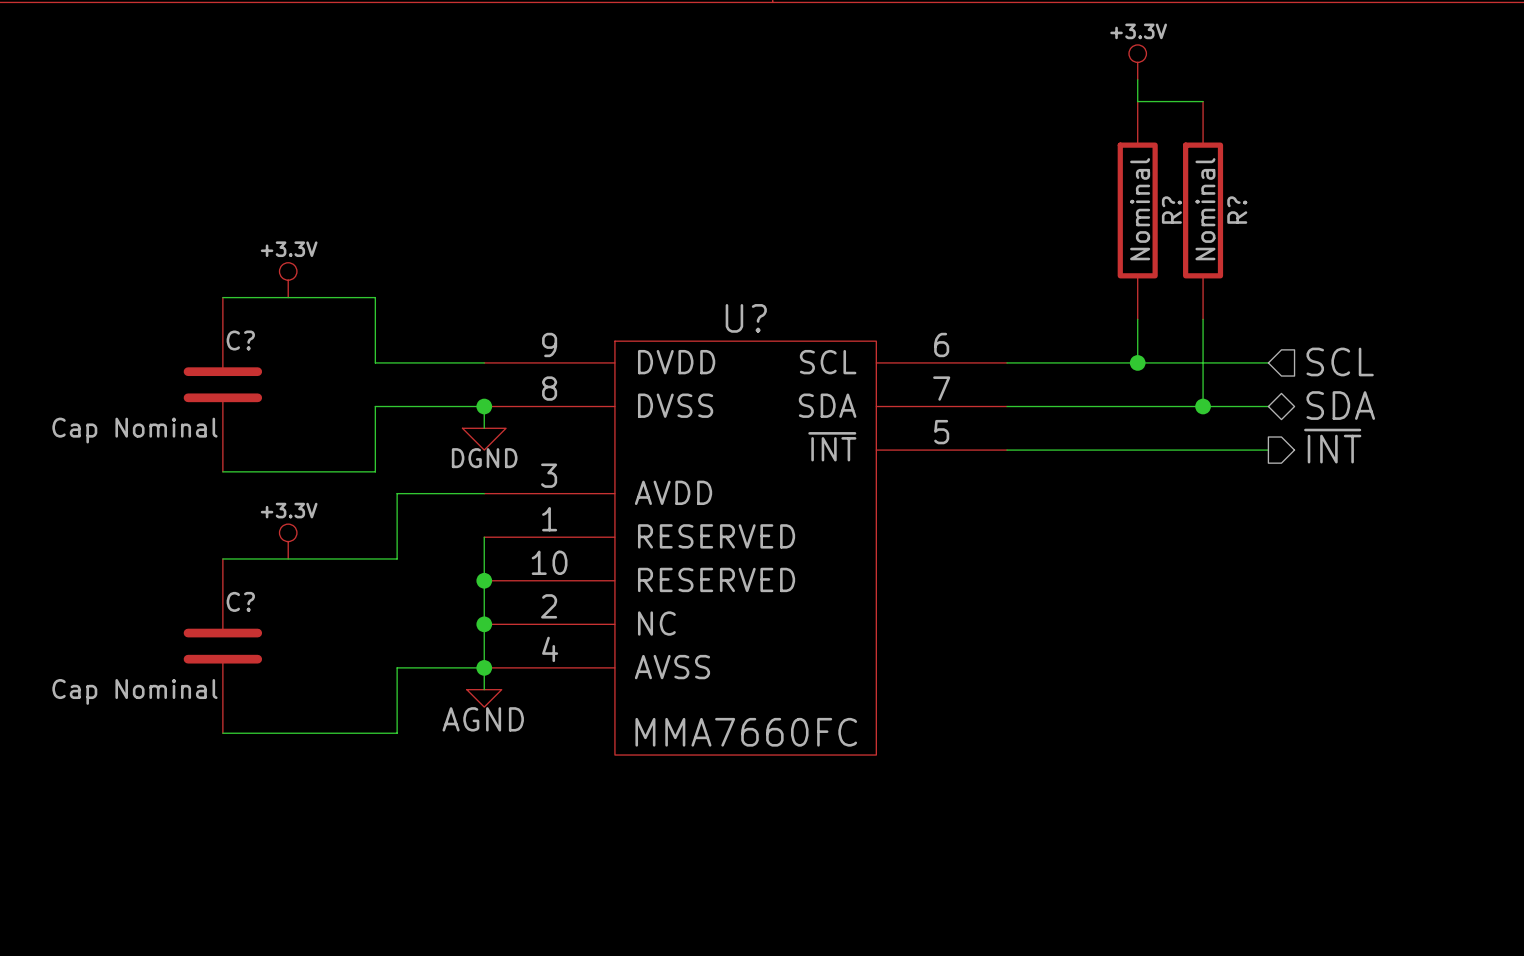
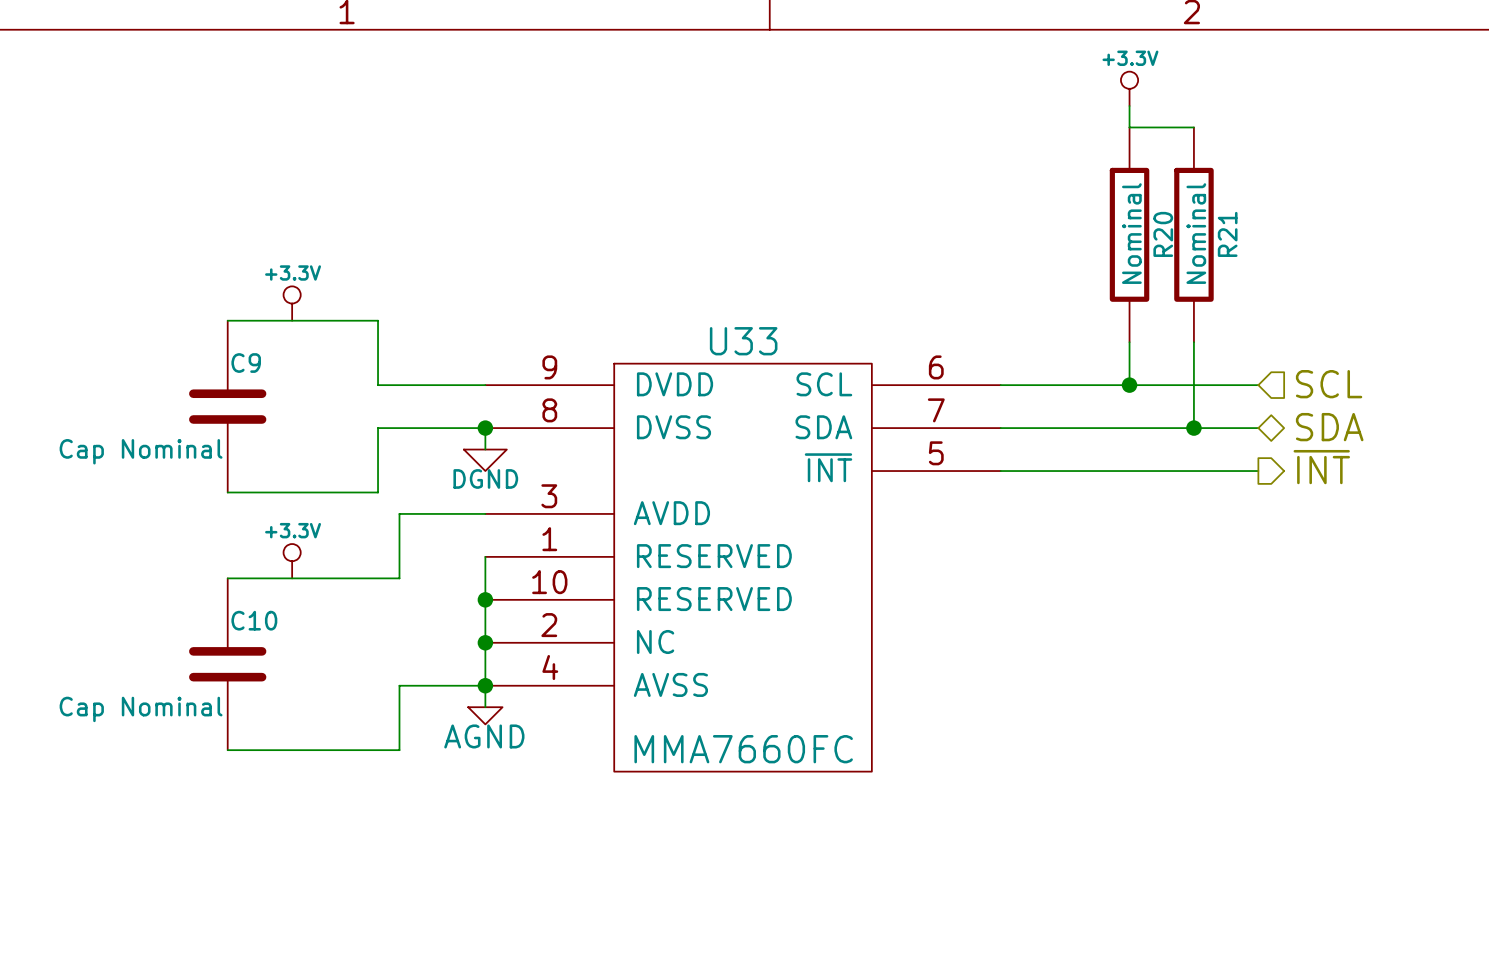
R? name: R? (1171, 210) -> R20 (1163, 234)
R? name: R? (1237, 210) -> R21 (1227, 234)
U? name: U? (746, 318) -> U33 (743, 341)
C? name: C? (240, 340) -> C9 (246, 363)
C? name: C? (240, 601) -> C10 (254, 620)

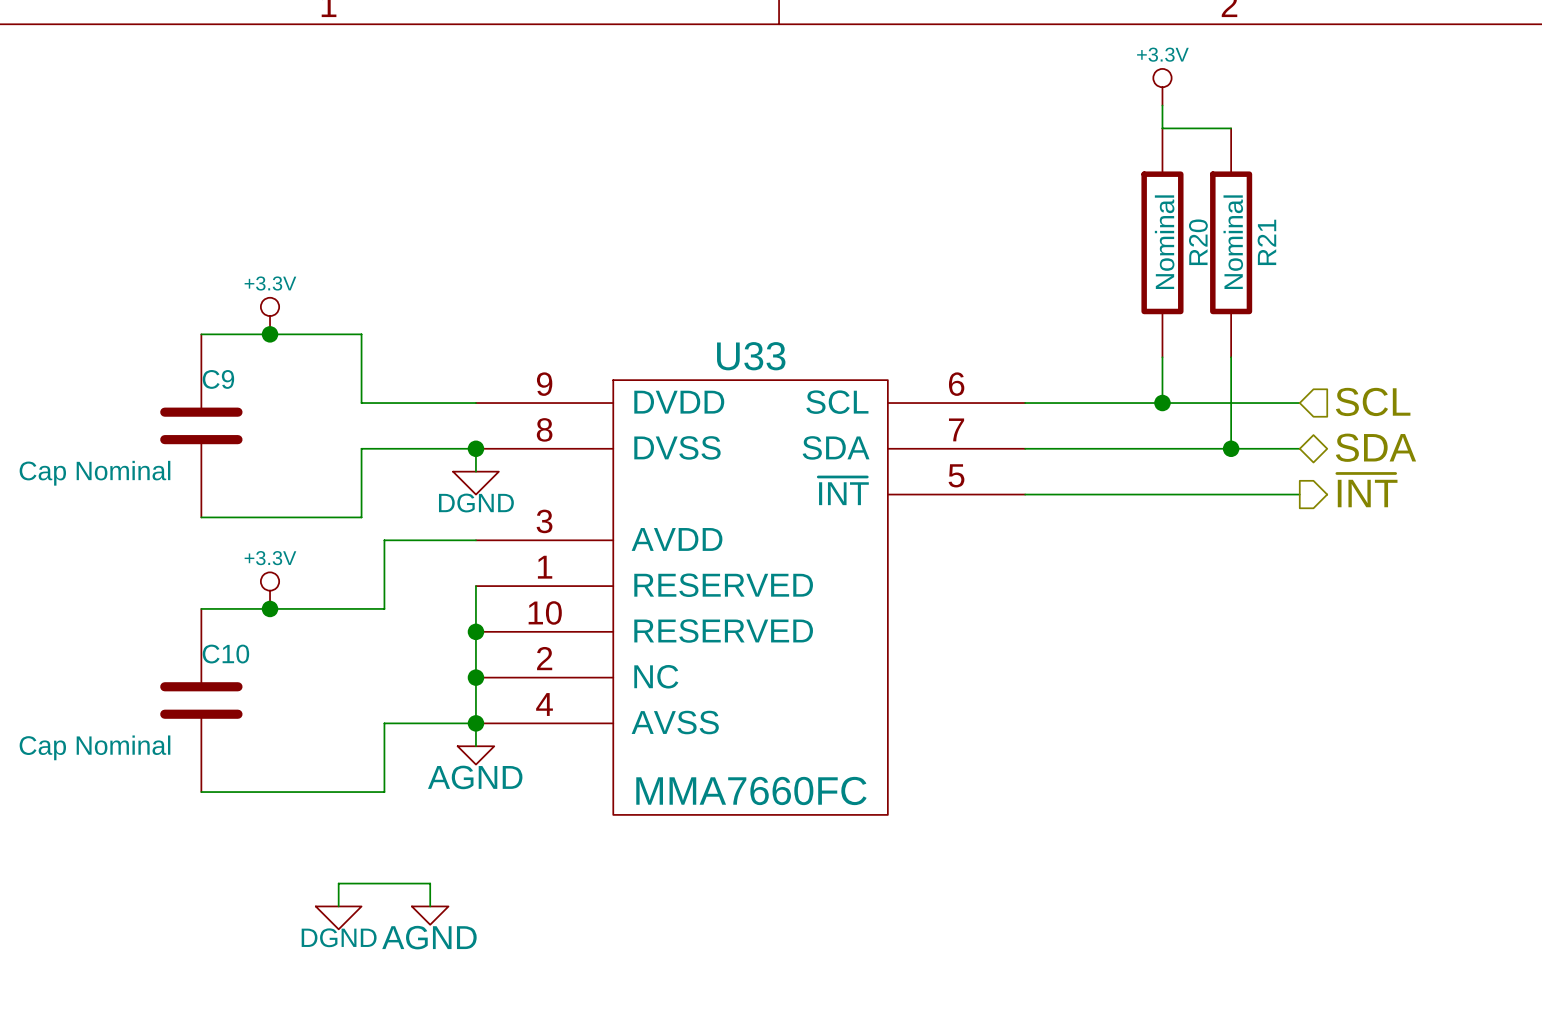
junction: none -> (270, 334)
junction: none -> (270, 608)
wire: none -> (338, 906) (338, 883) (430, 883) (430, 906)
power symbol: none -> AGND (430, 915)
power symbol: none -> DGND (338, 917)

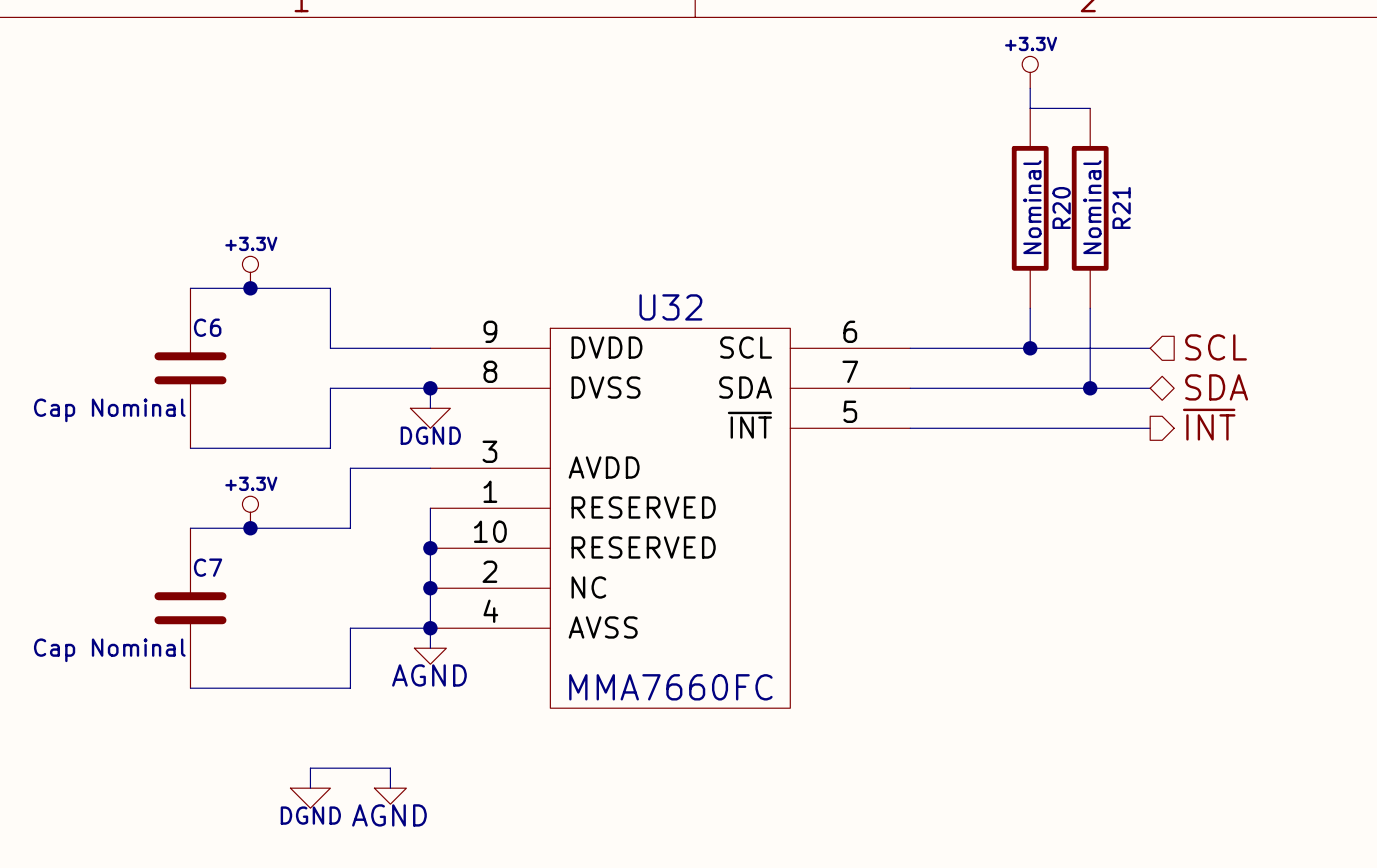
U33 name: U33 (751, 356) -> U32 (670, 307)
C9 name: C9 (218, 379) -> C6 (207, 327)
C10 name: C10 (225, 654) -> C7 (208, 567)

